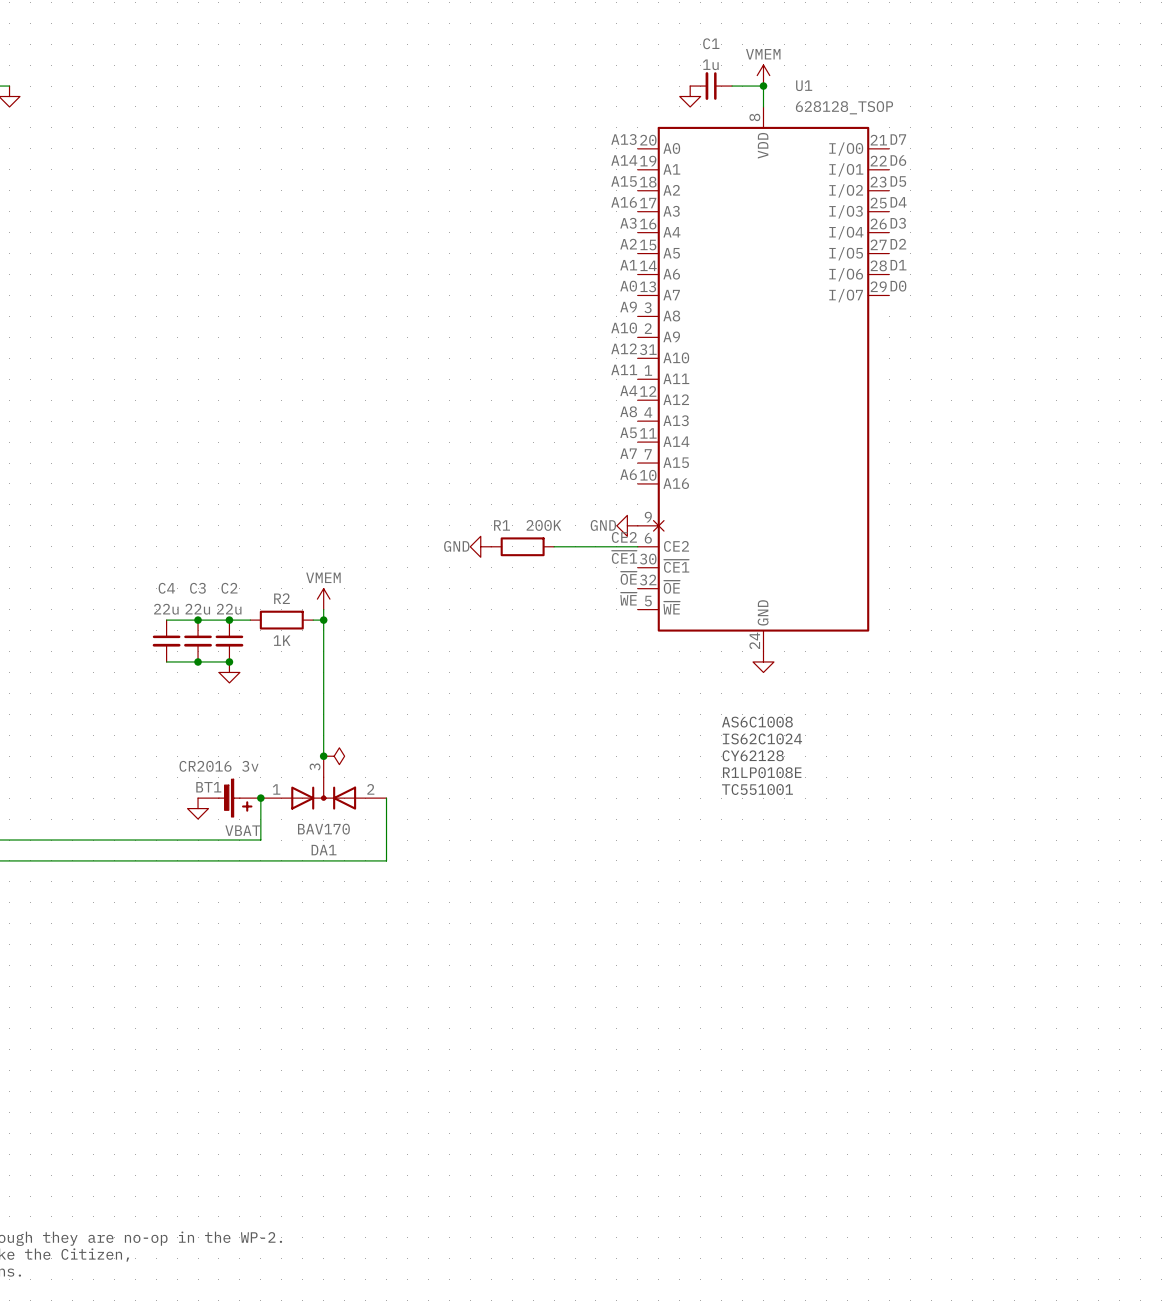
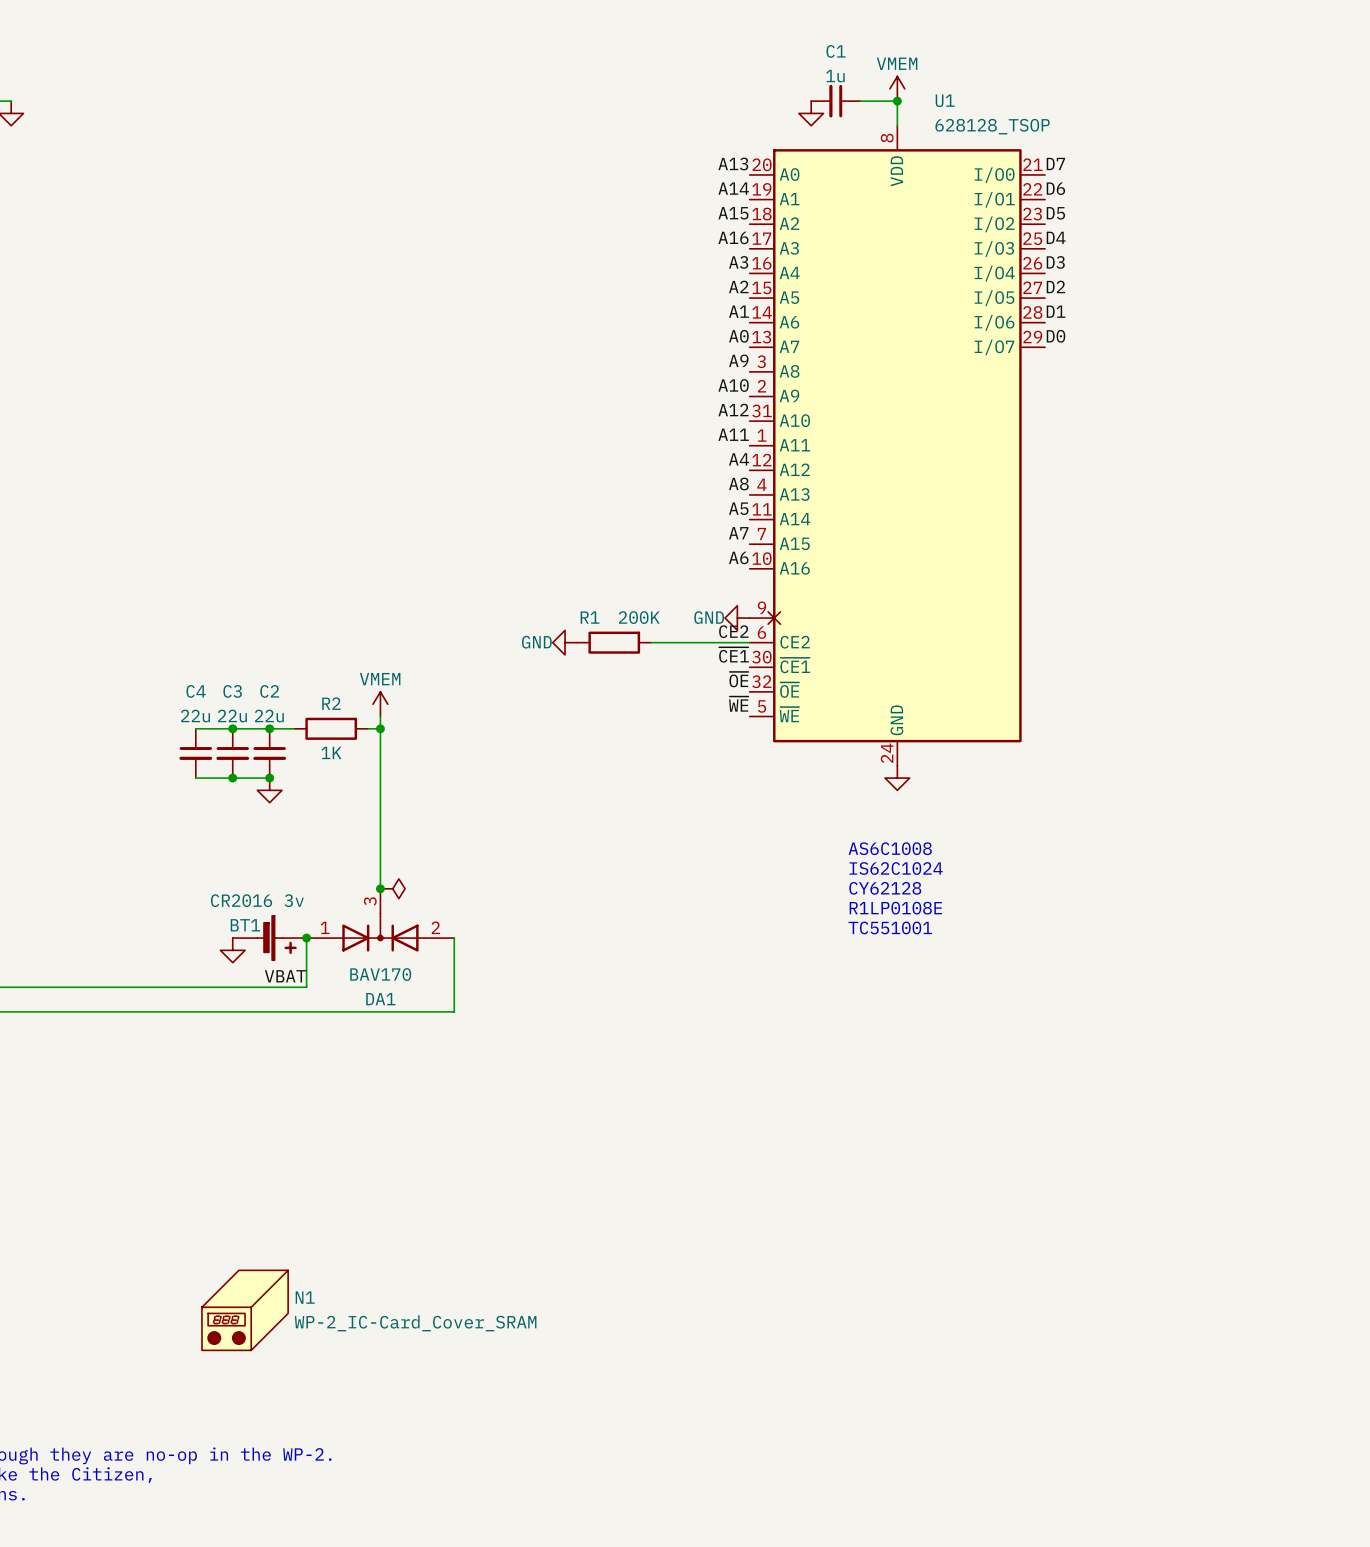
N1: none -> WP-2_IC-Card_Cover_SRAM (245, 1310)

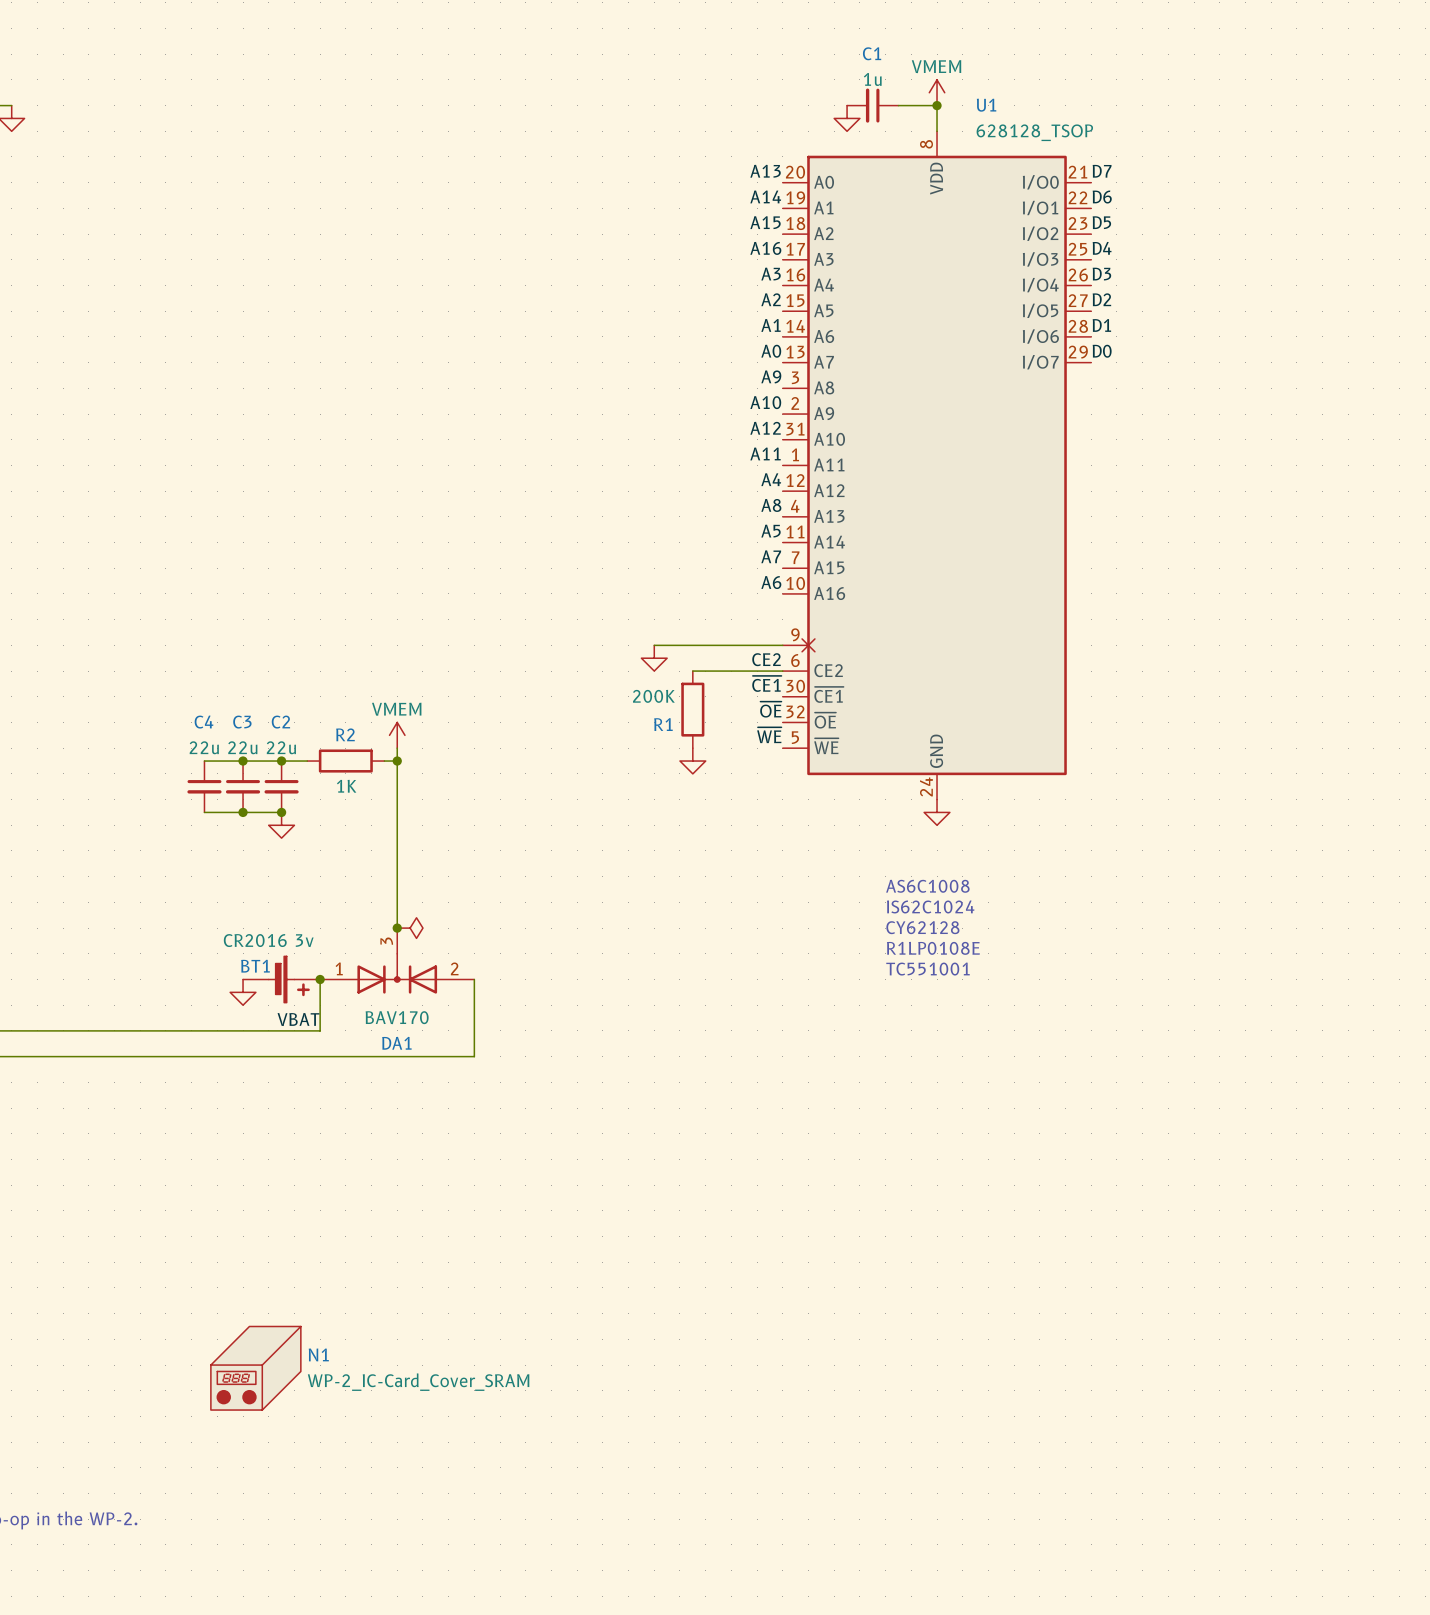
R1 name position: R1 (590, 617) -> R1 (663, 724)
R1 value position: 200K (639, 617) -> 200K (653, 696)
wire: none -> (654, 645) (782, 645)
power symbol: GND (737, 618) -> none
power symbol: none -> (654, 658)
power symbol: GND (565, 642) -> none
R1 rotation: 0° (614, 642) -> 90° clockwise (692, 709)
R1 position: (614, 642) -> (692, 709)
wire: (651, 642) (663, 642) -> none
power symbol: none -> (692, 761)

